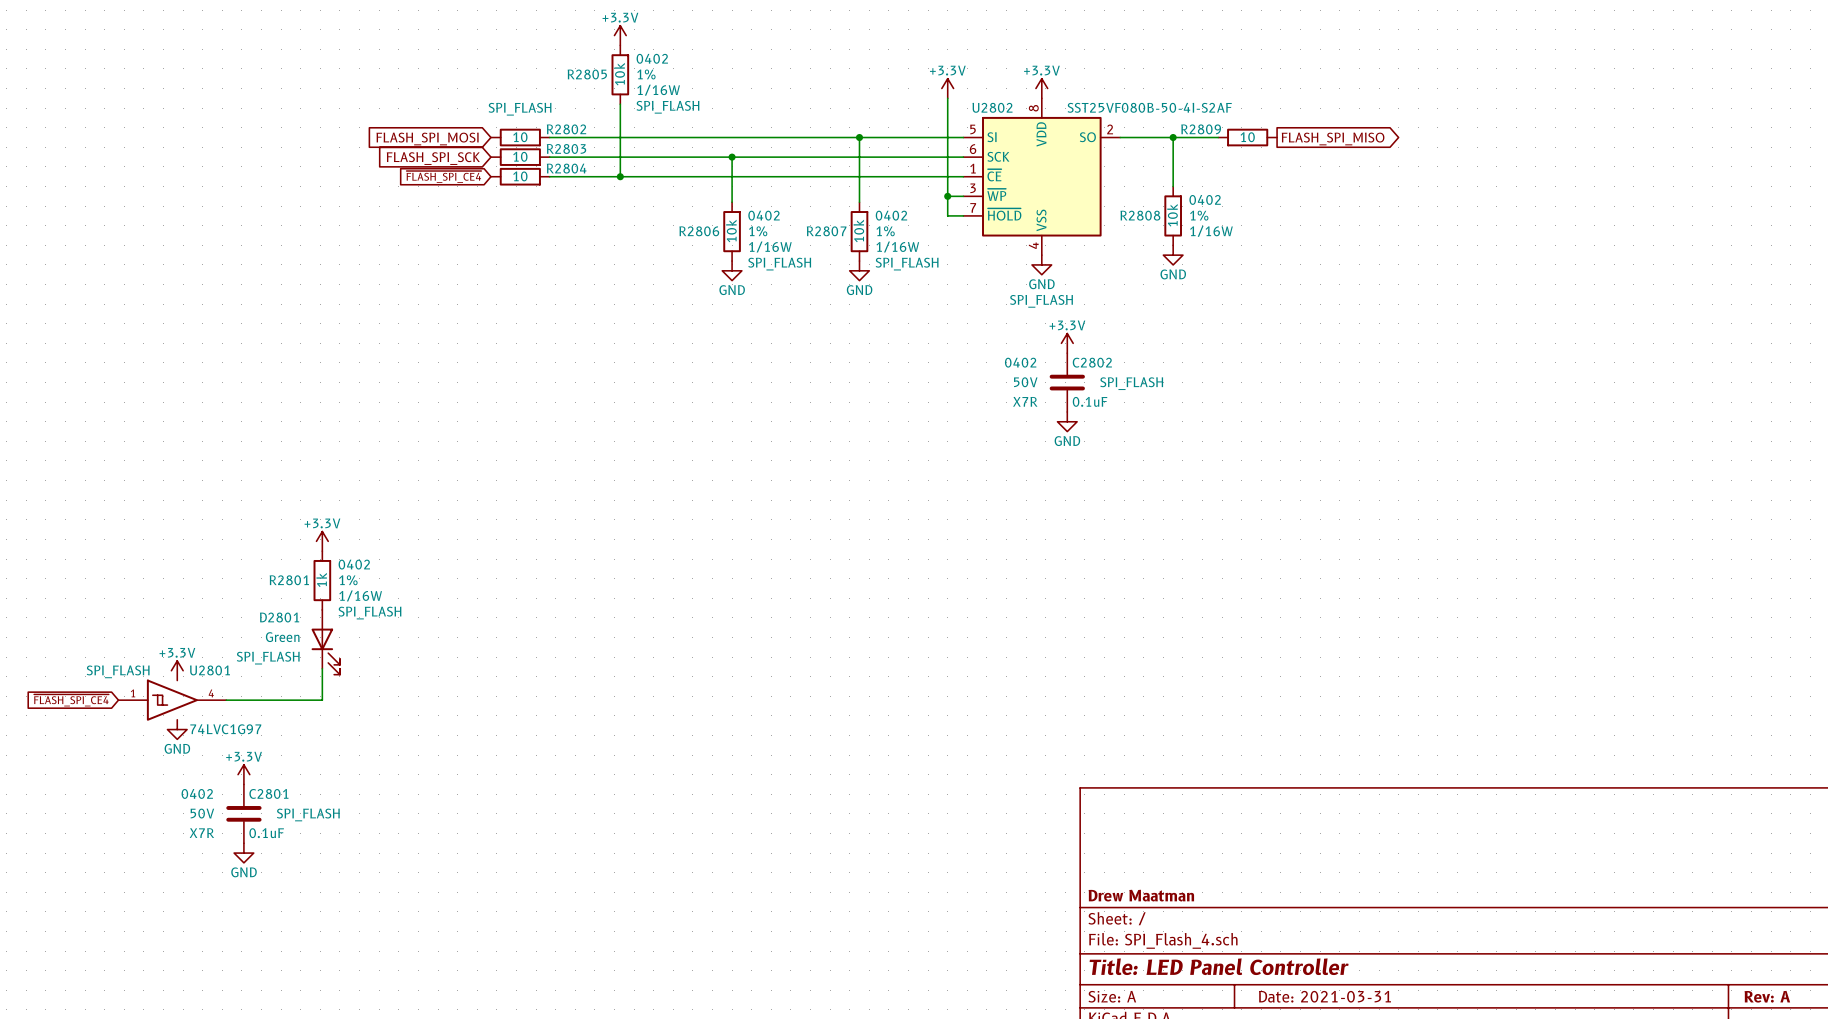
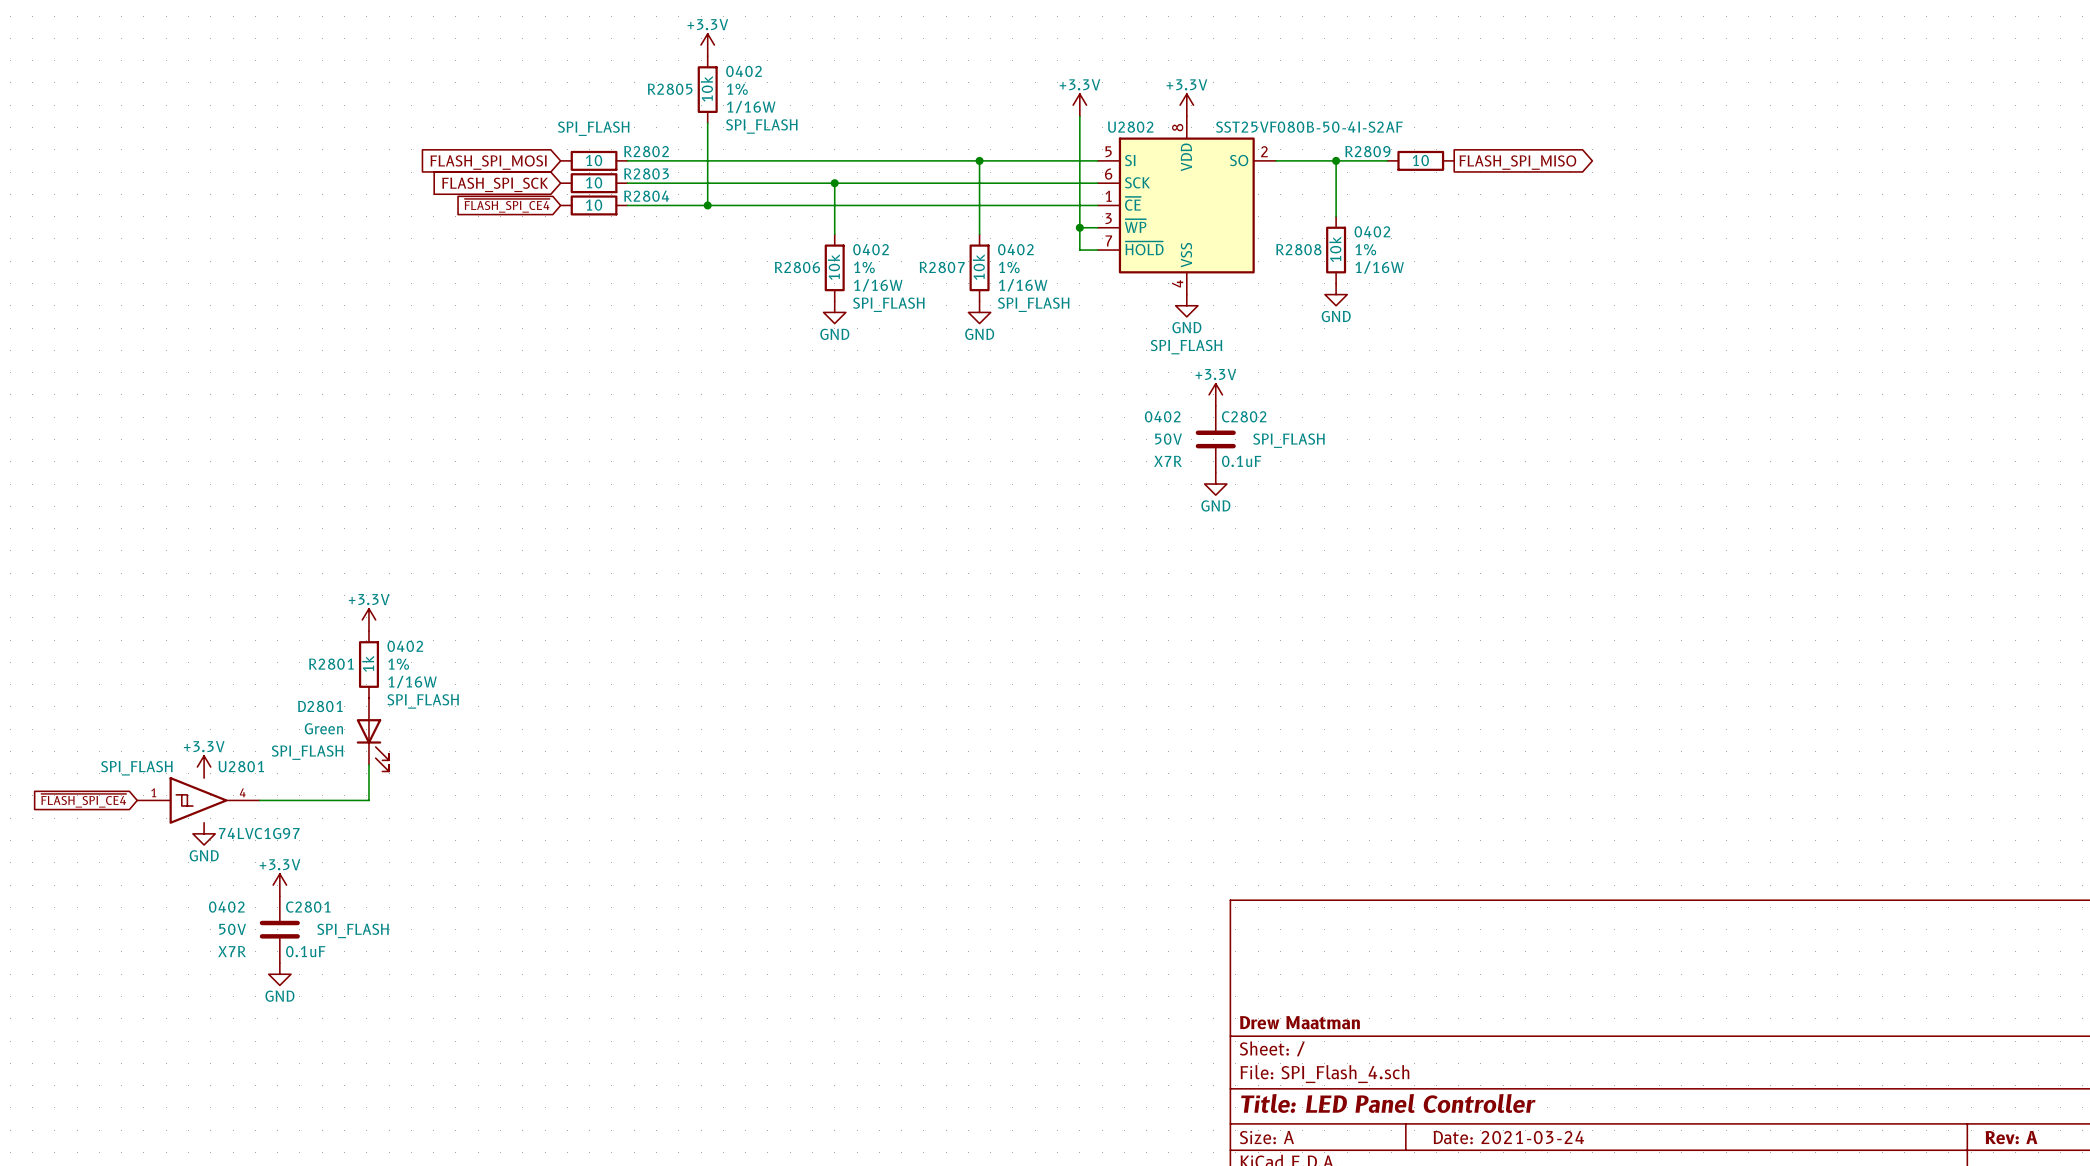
title block: Date: 2021-03-31 (1324, 996) -> Date: 2021-03-24 (1508, 1137)

